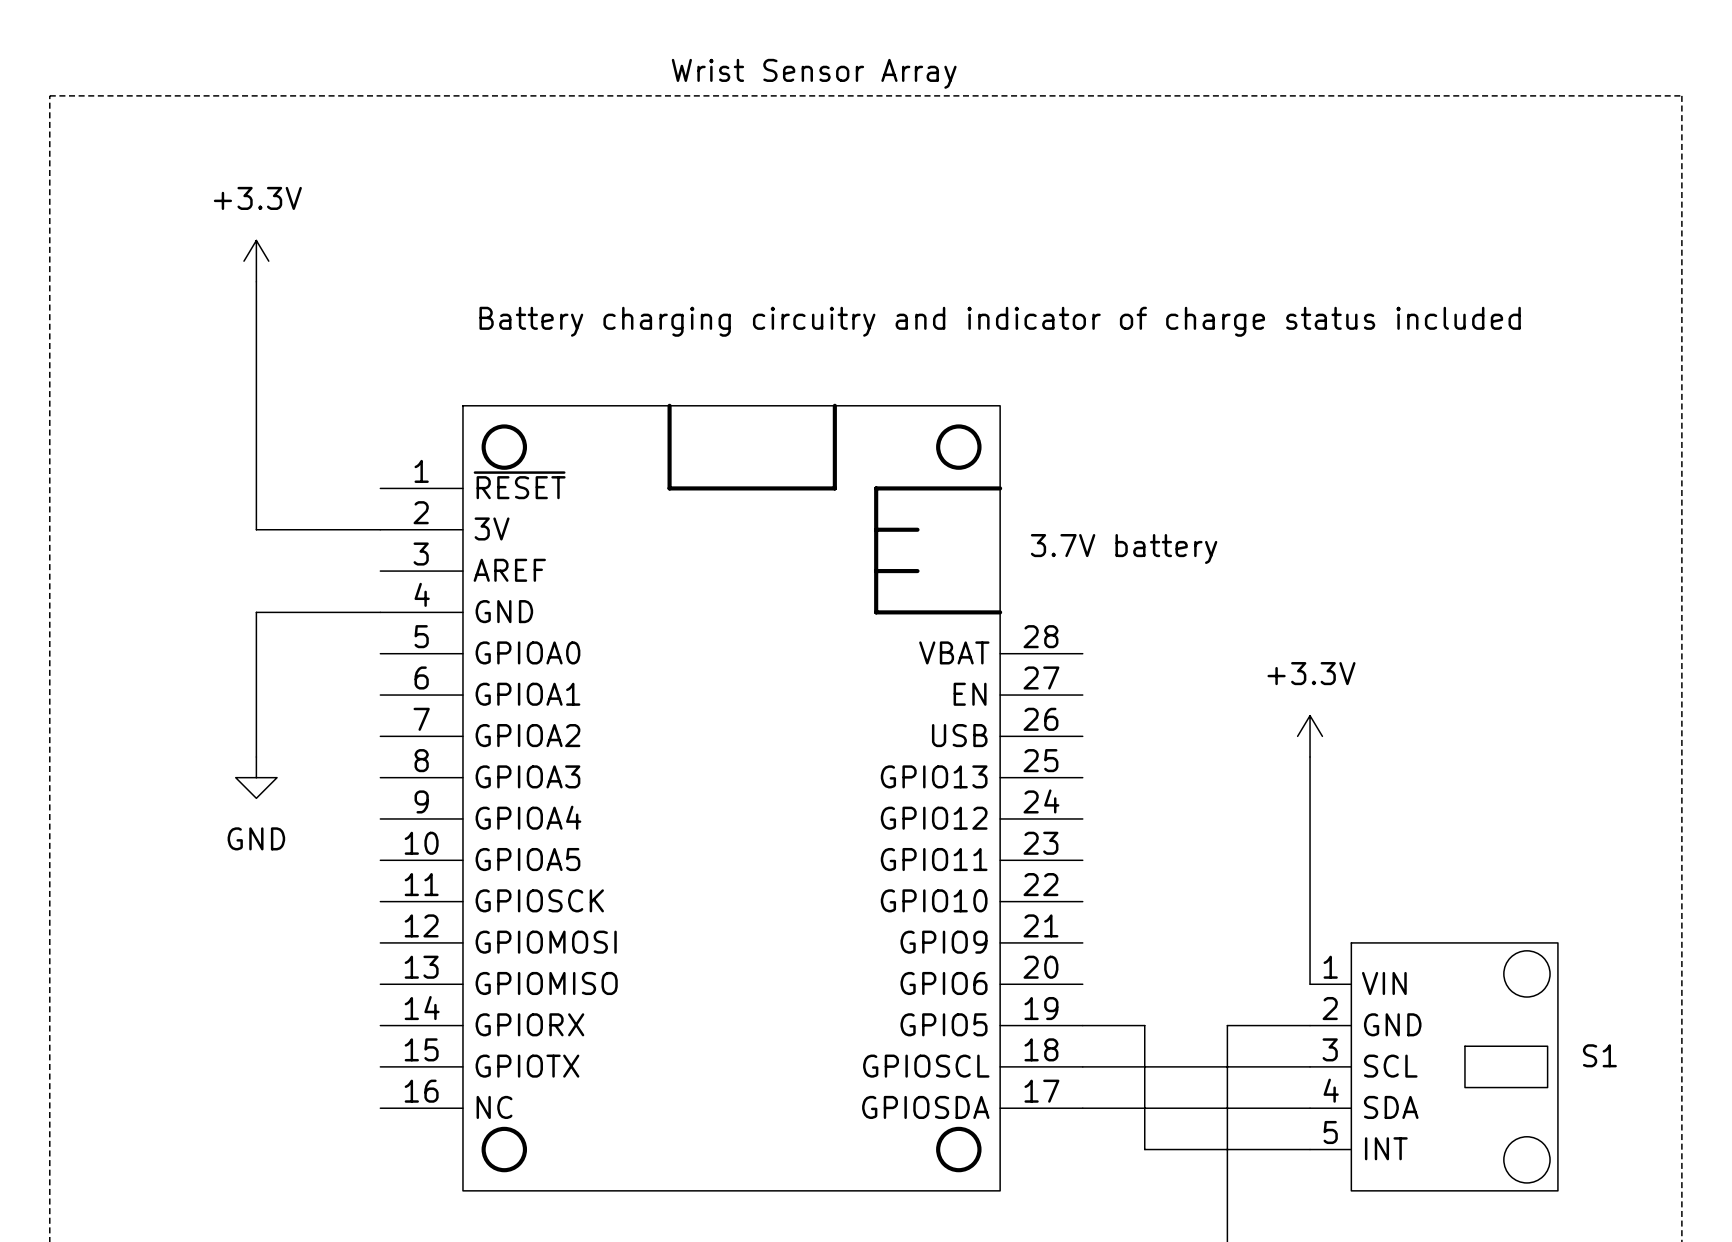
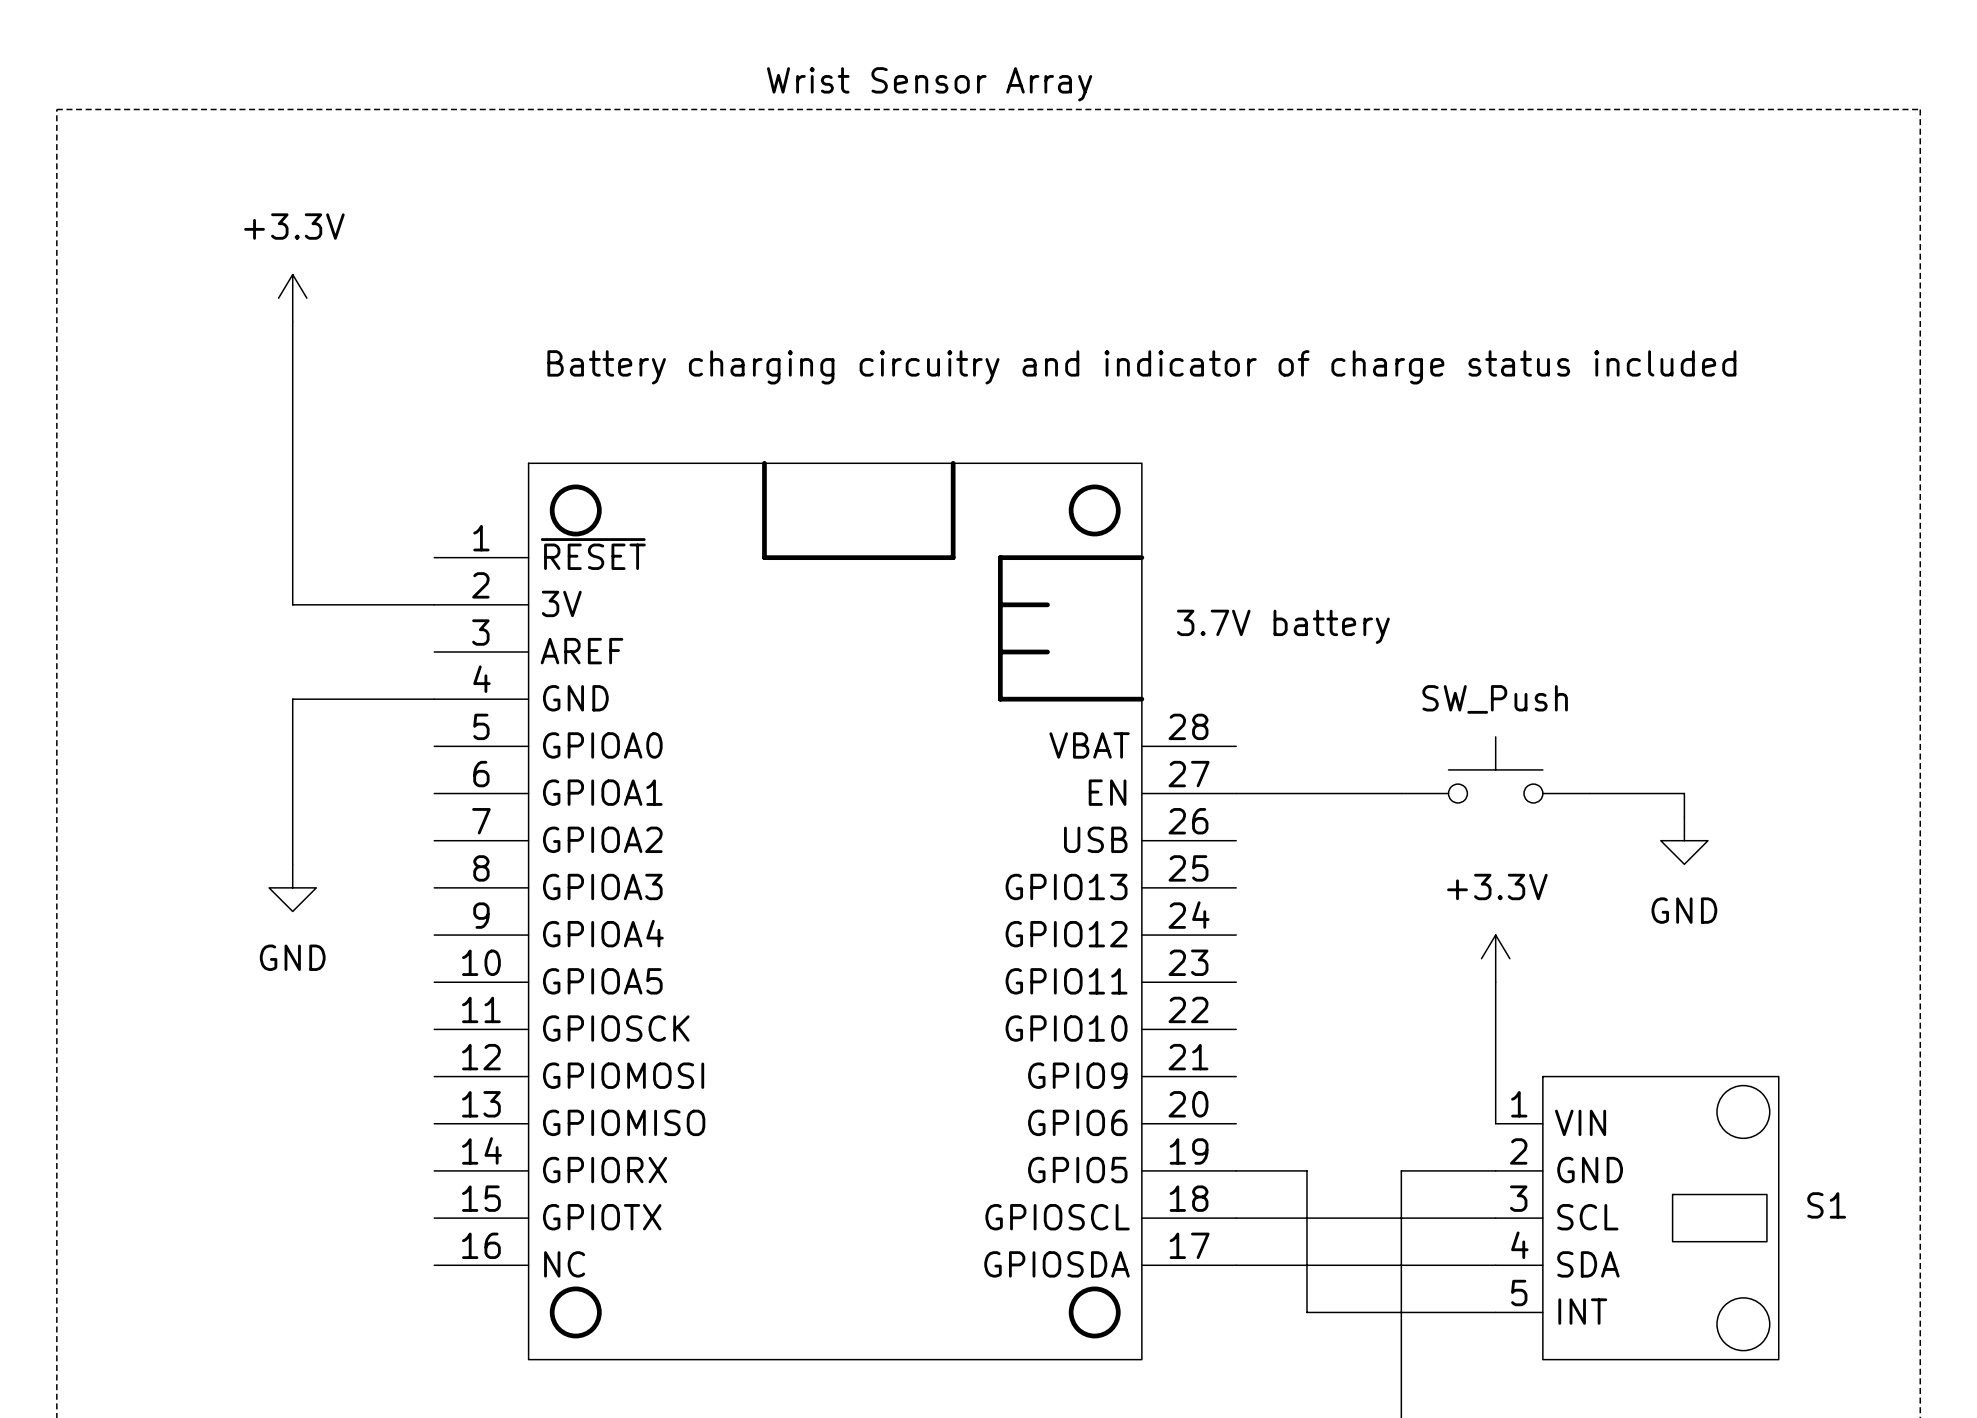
part: none -> SW_Push (1495, 769)
wire: none -> (1236, 793) (1401, 793)
wire: none -> (1590, 793) (1684, 793) (1684, 817)
power symbol position: +3.3V (1310, 736) -> +3.3V (1495, 958)
power symbol: none -> GND (1684, 840)
wire: (1310, 757) (1310, 860) -> none

